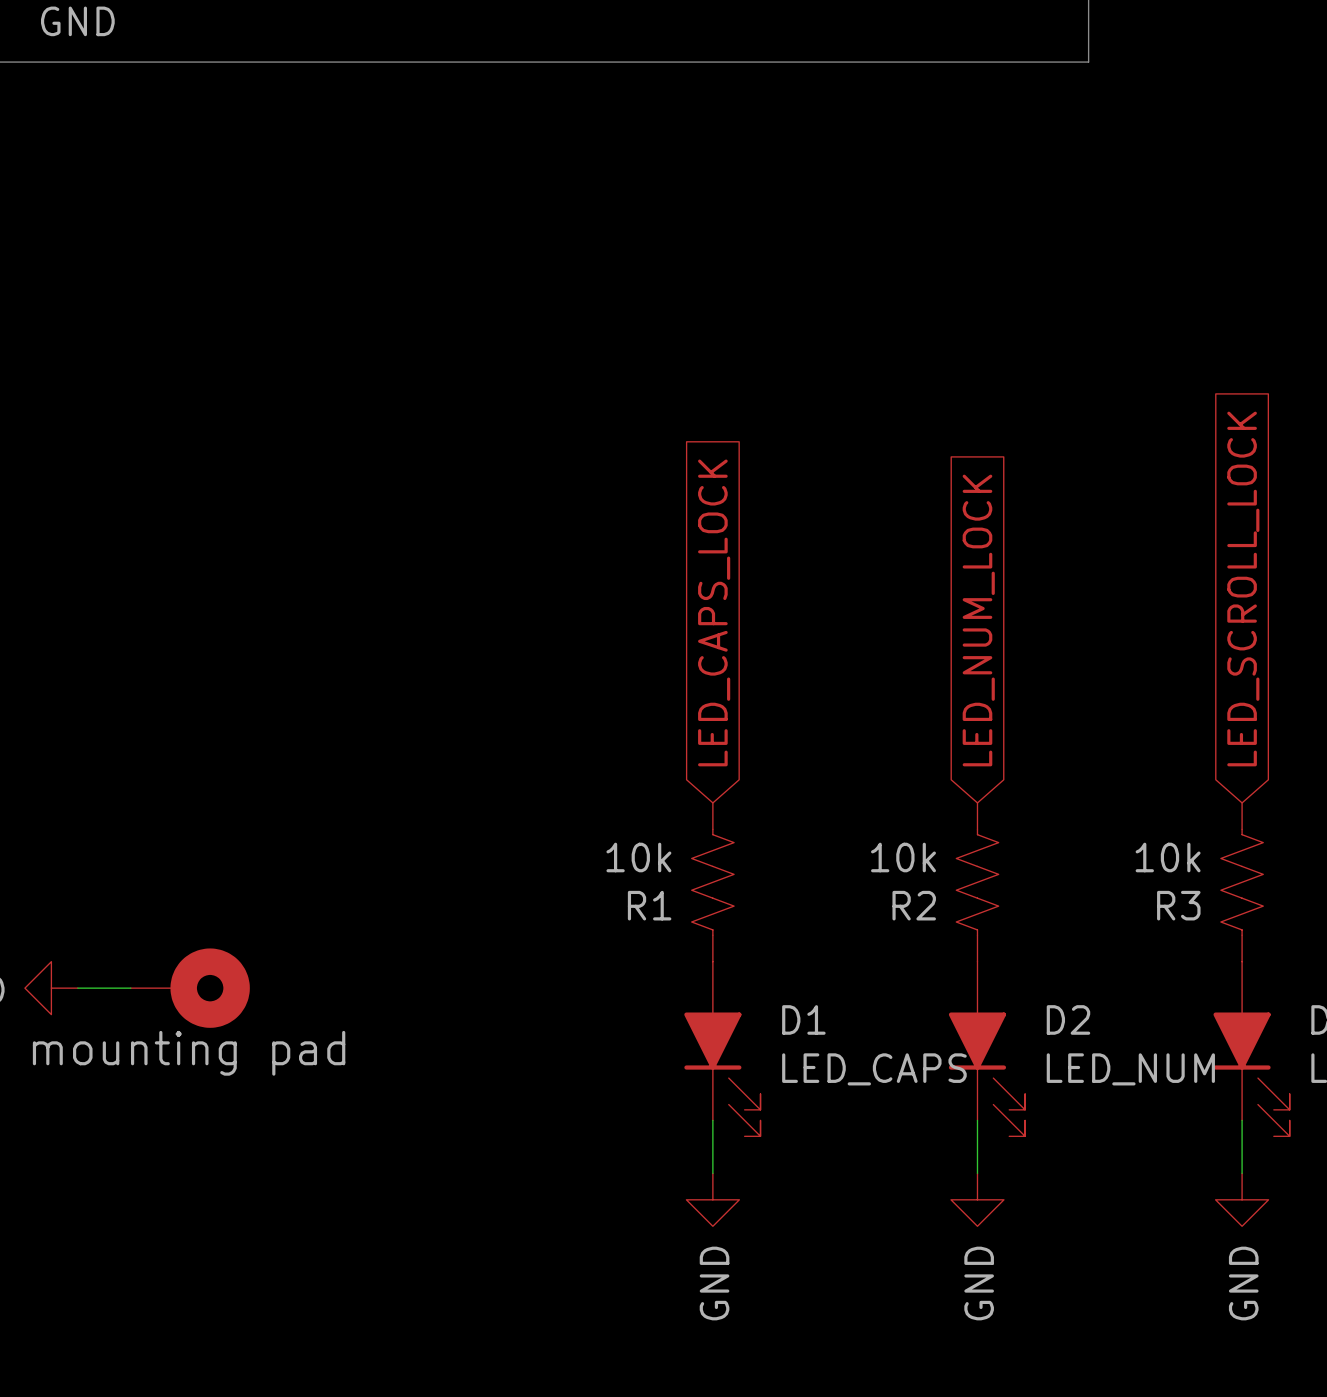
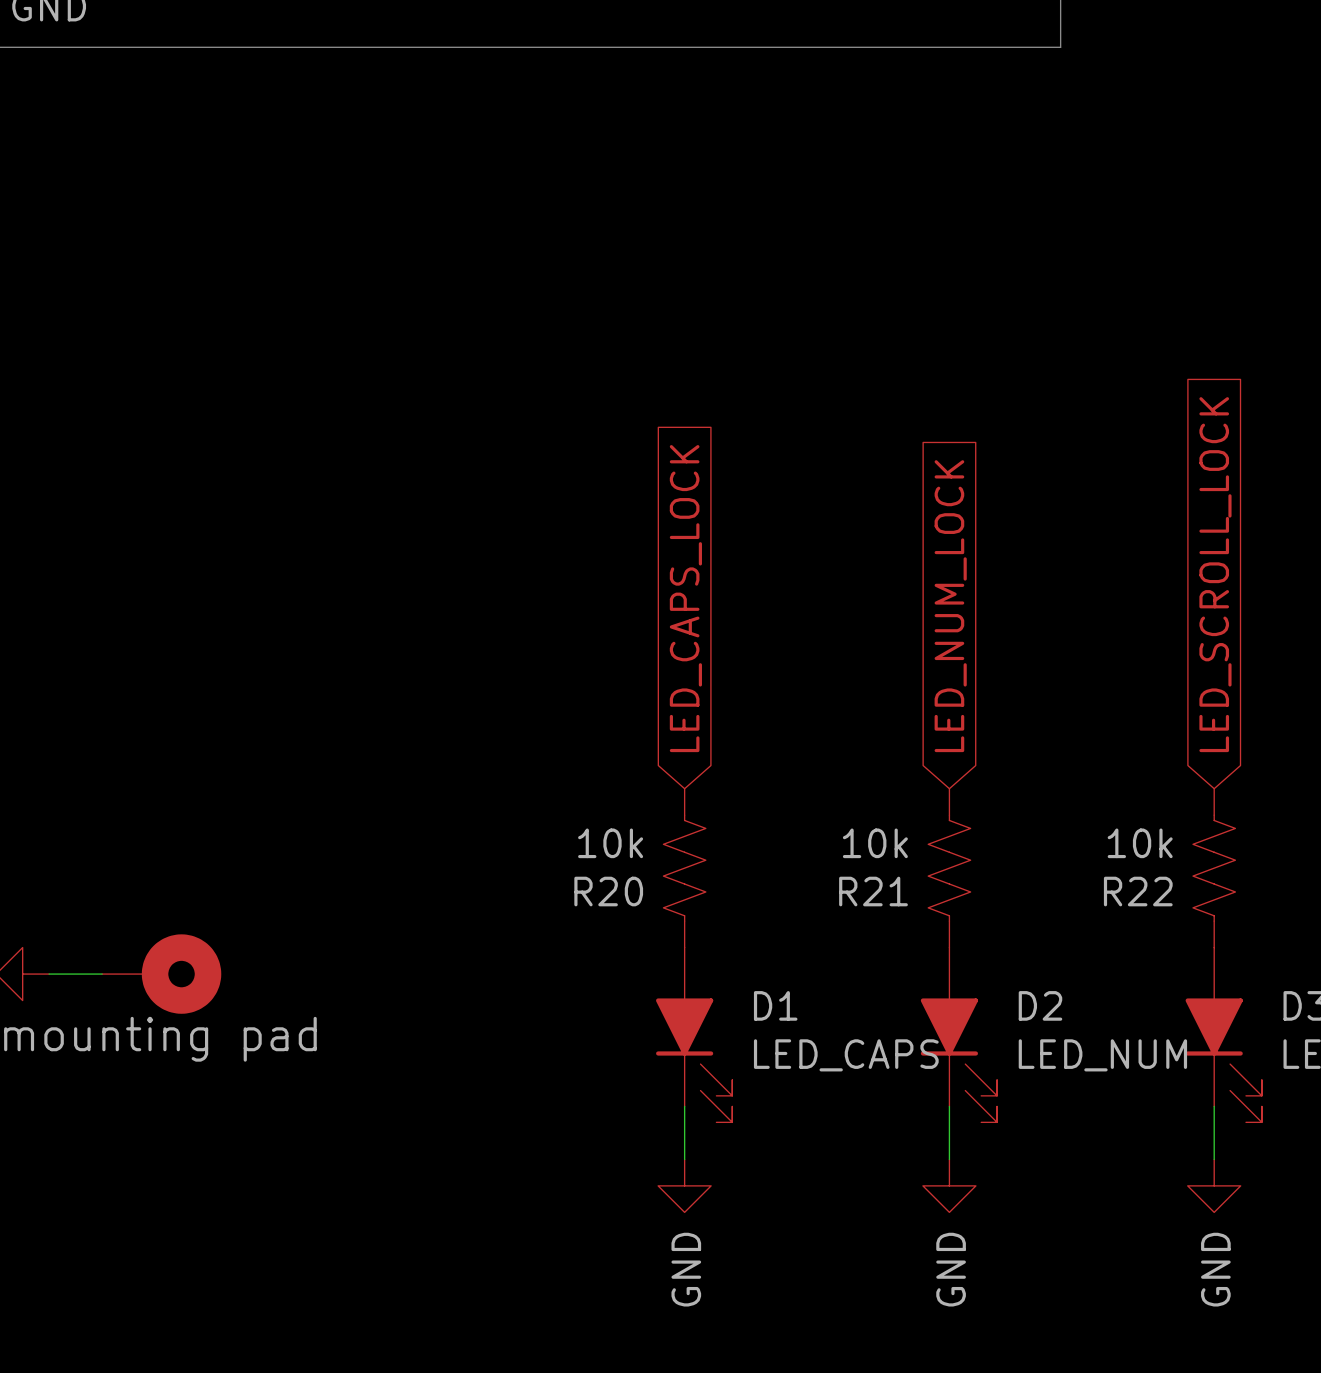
R1 name: R1 (649, 905) -> R20 (608, 891)
R2 name: R2 (914, 905) -> R21 (873, 891)
R3 name: R3 (1178, 905) -> R22 (1138, 891)

